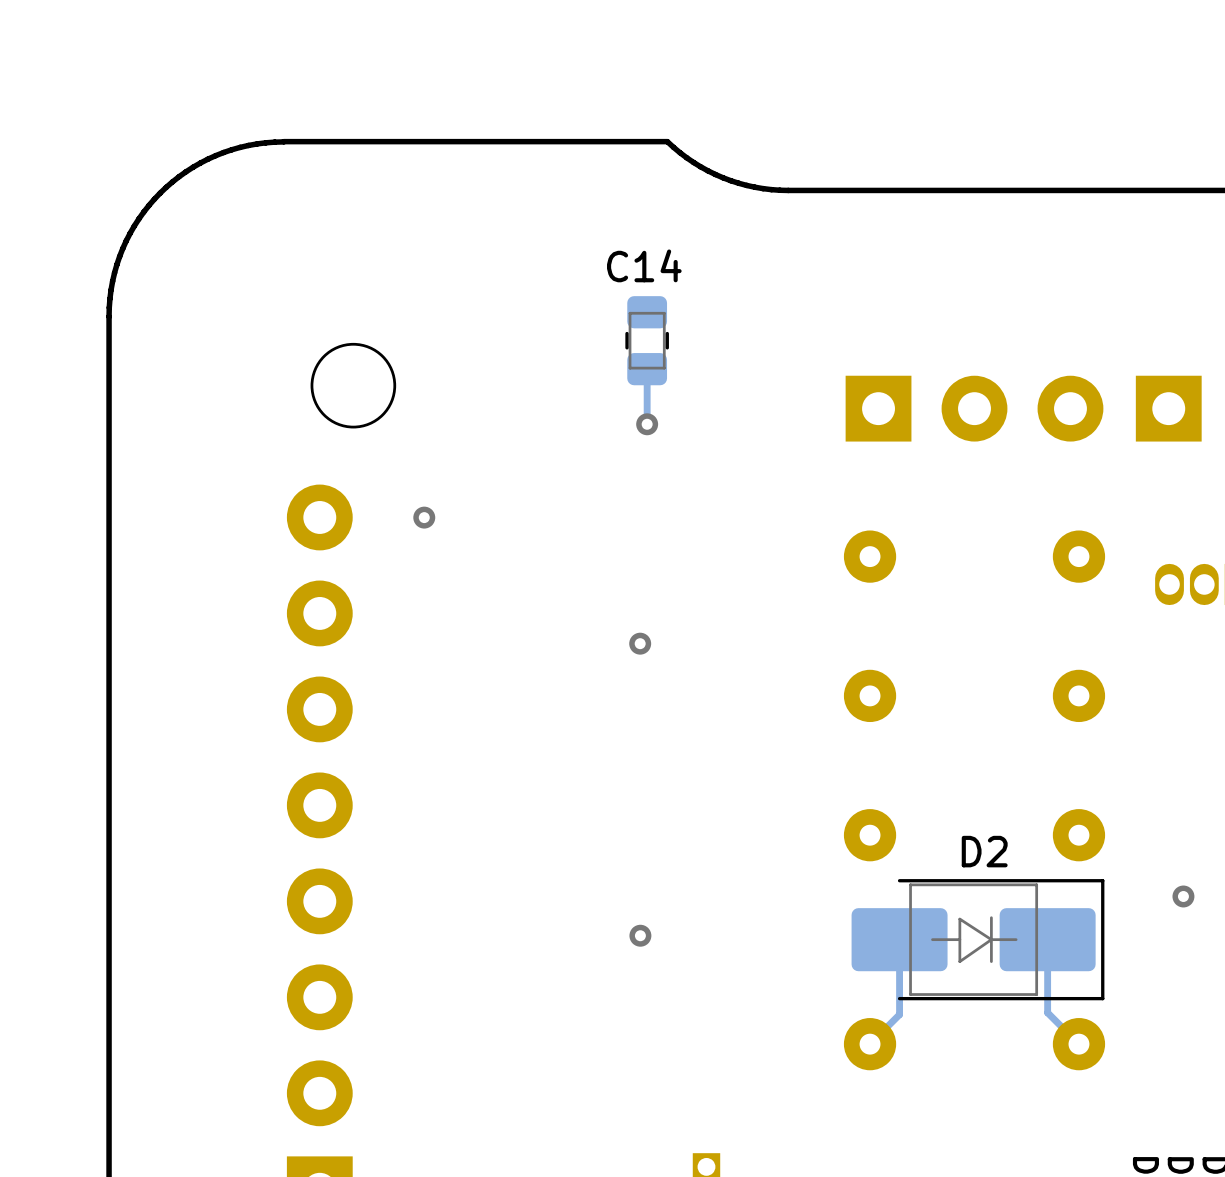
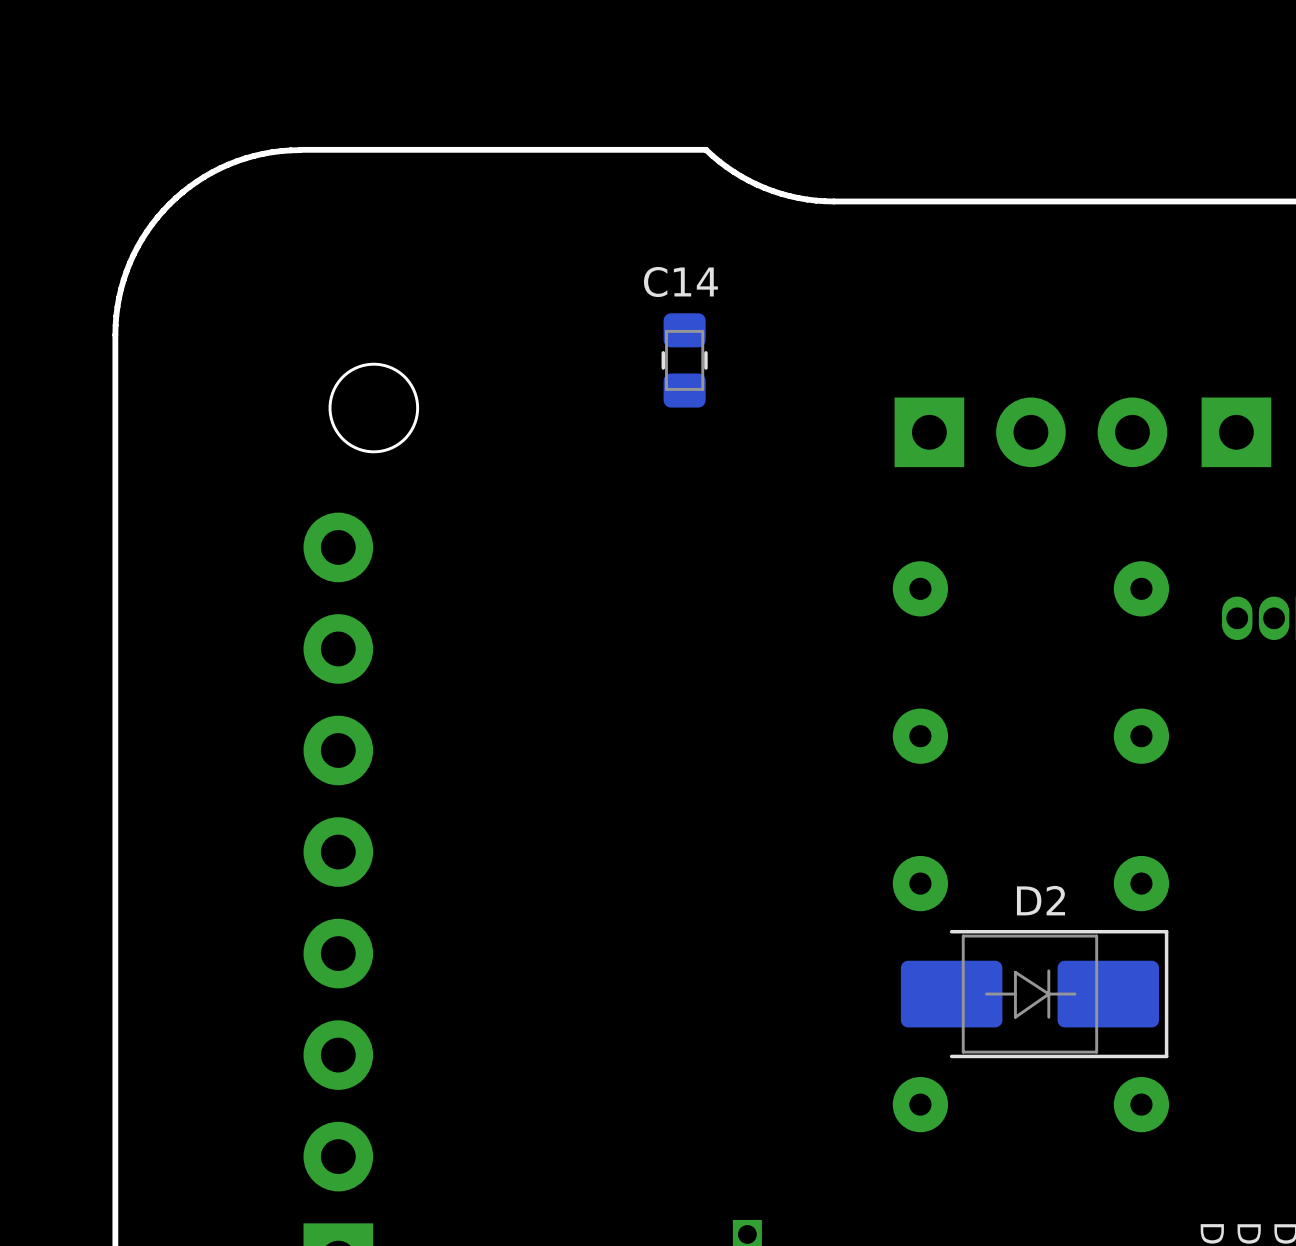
track: (647, 369) (647, 424) -> none
via: (647, 424) -> none
via: (424, 517) -> none
via: (640, 643) -> none
via: (1183, 896) -> none
via: (640, 935) -> none
track: (899, 939) (899, 1014) (870, 1044) -> none
track: (1047, 939) (1047, 1012) (1078, 1044) -> none

